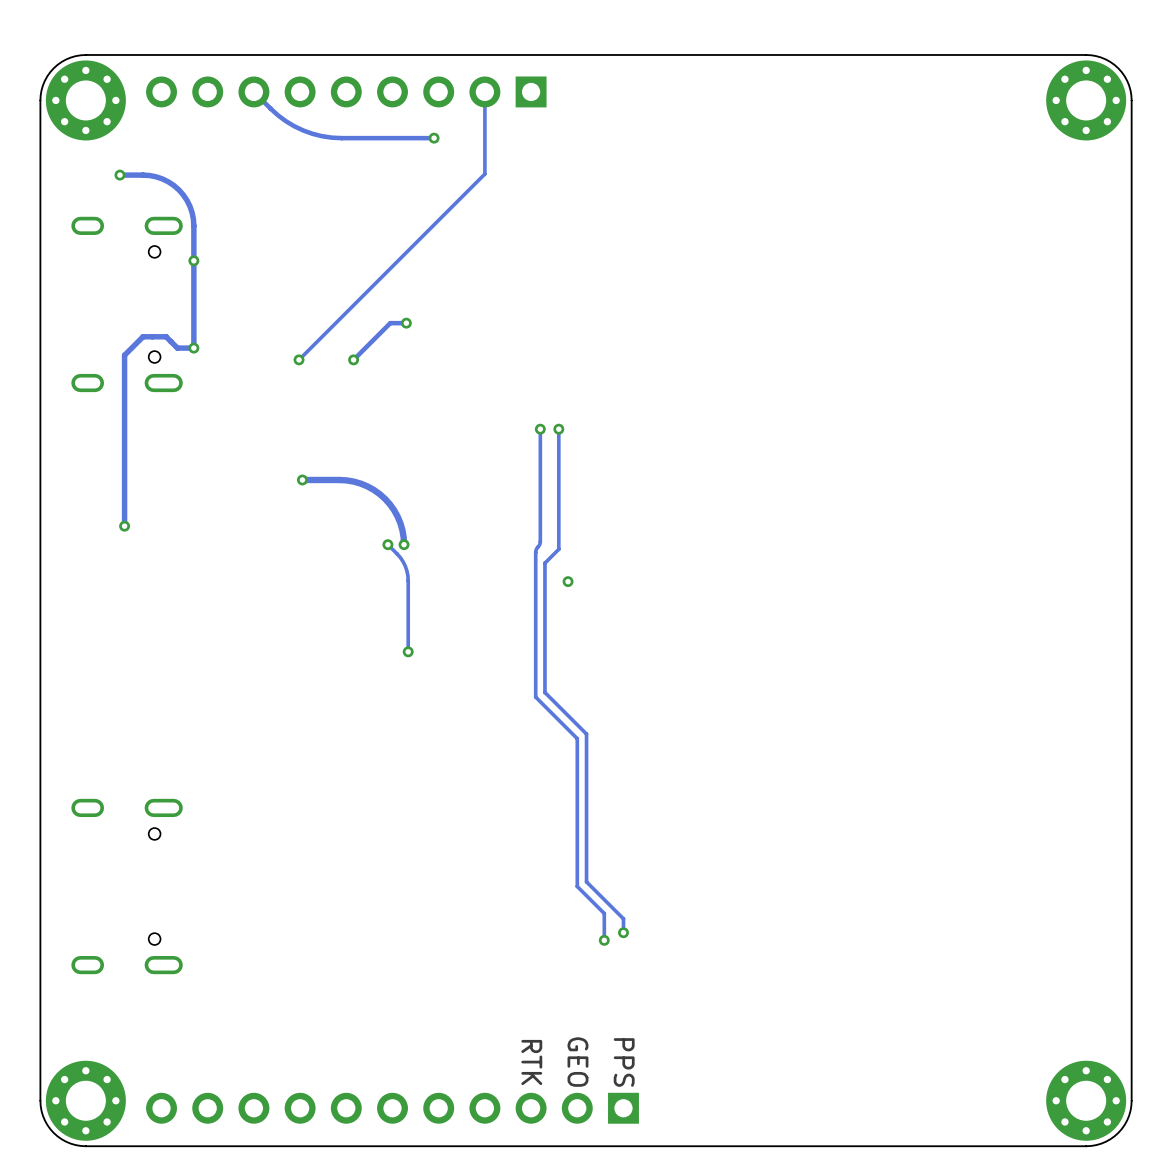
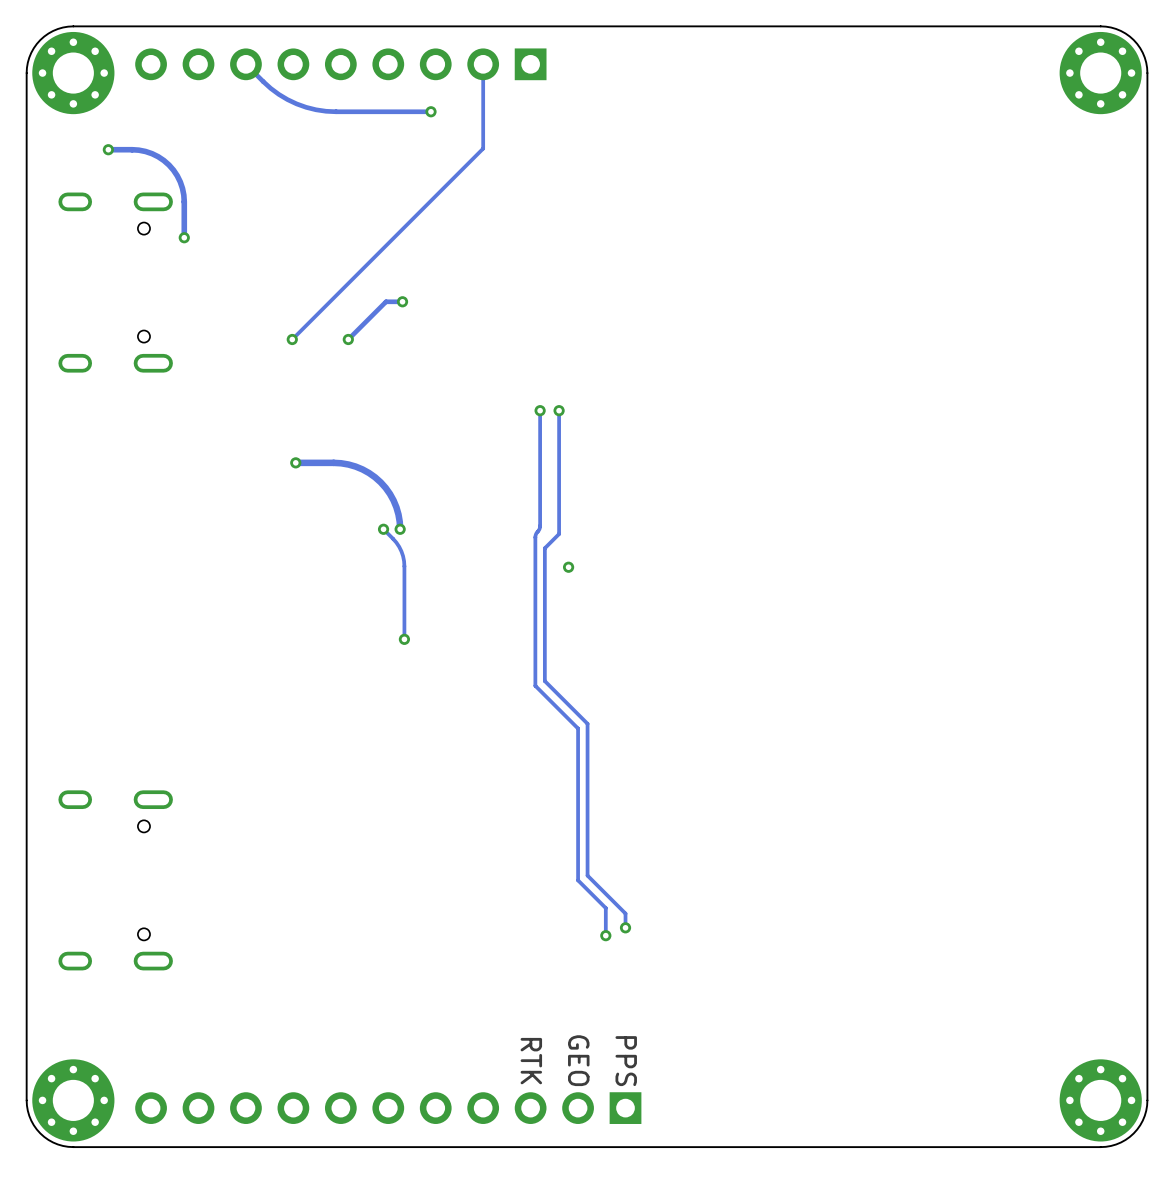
track: (193, 260) (193, 348) (177, 348) (166, 336) (143, 336) (124, 355) (124, 526) -> none
via: (193, 348) -> none
via: (124, 526) -> none

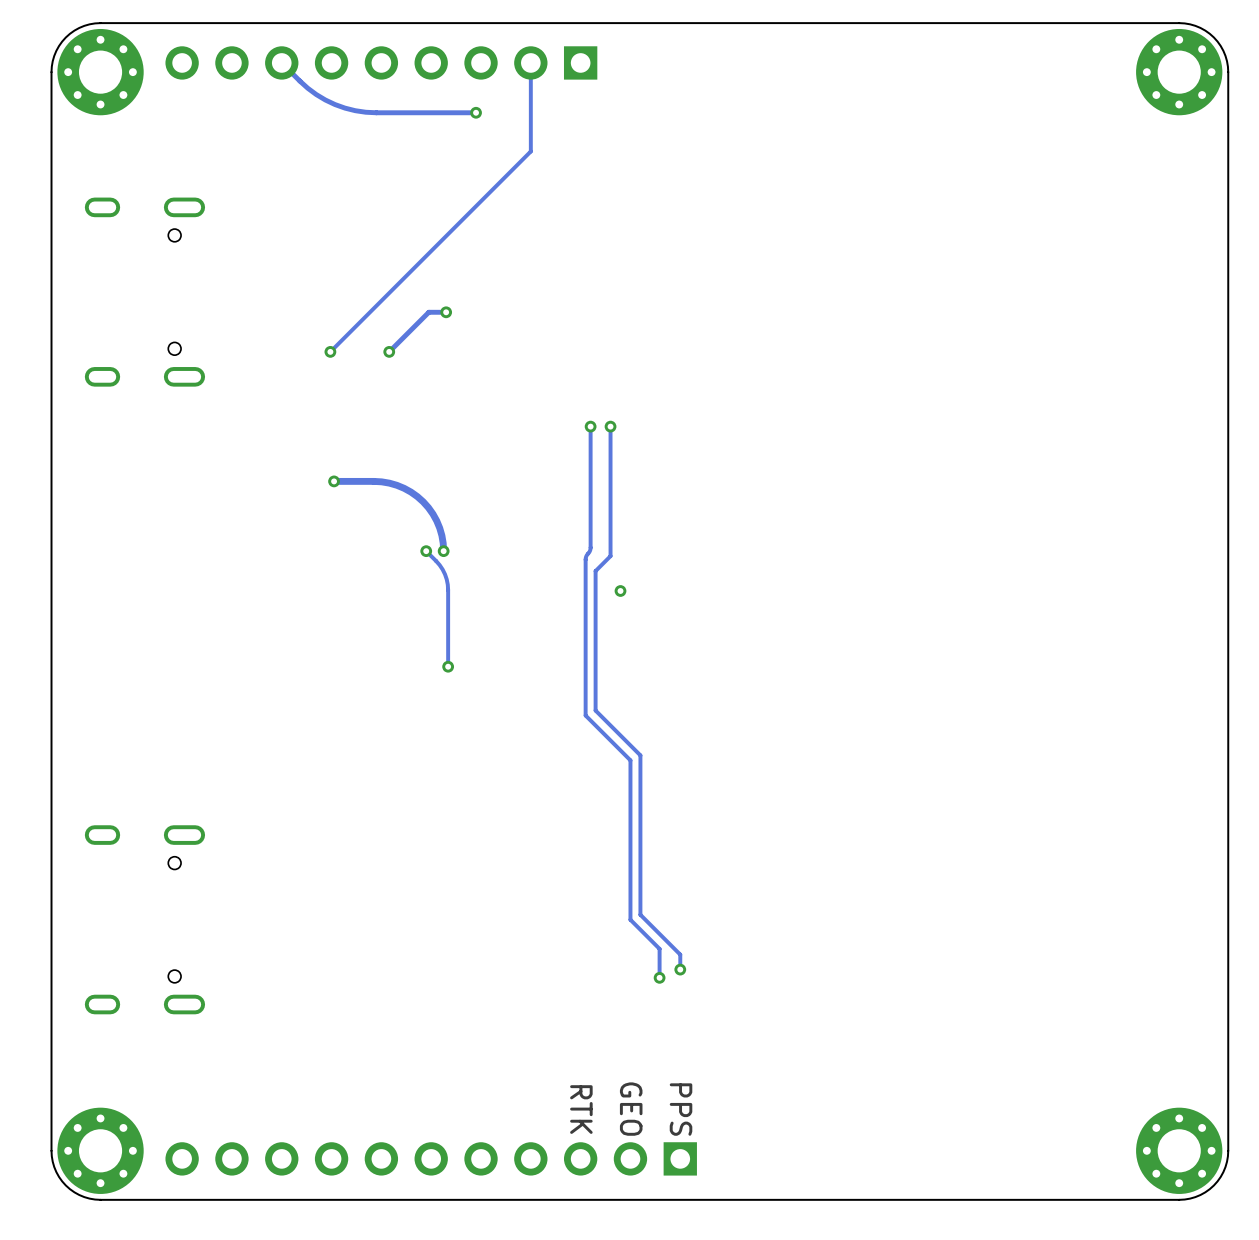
track: (108, 149) (145, 151) (163, 160) (173, 170) (180, 181) (183, 195) (184, 237) -> none
via: (108, 149) -> none
via: (184, 237) -> none

